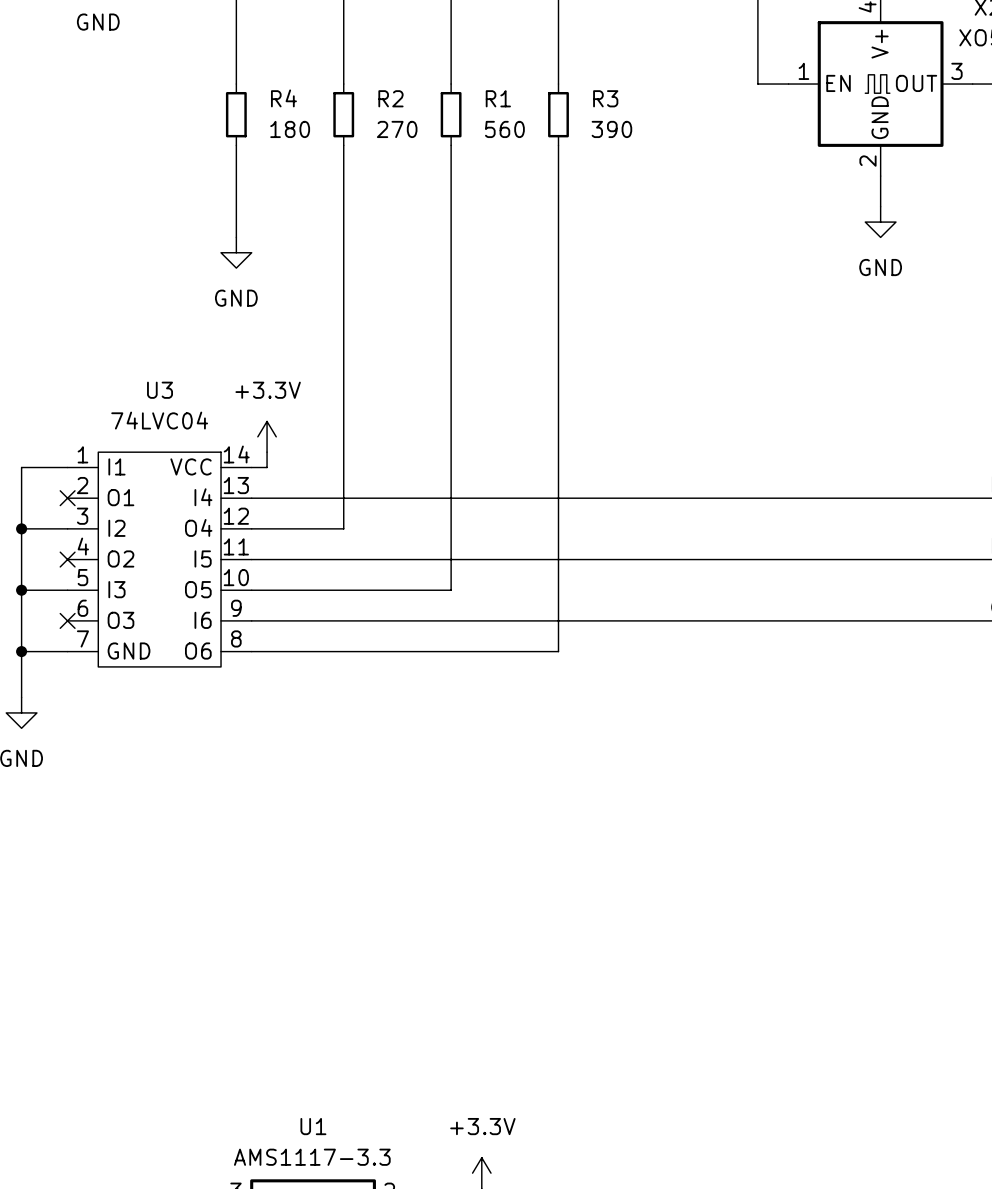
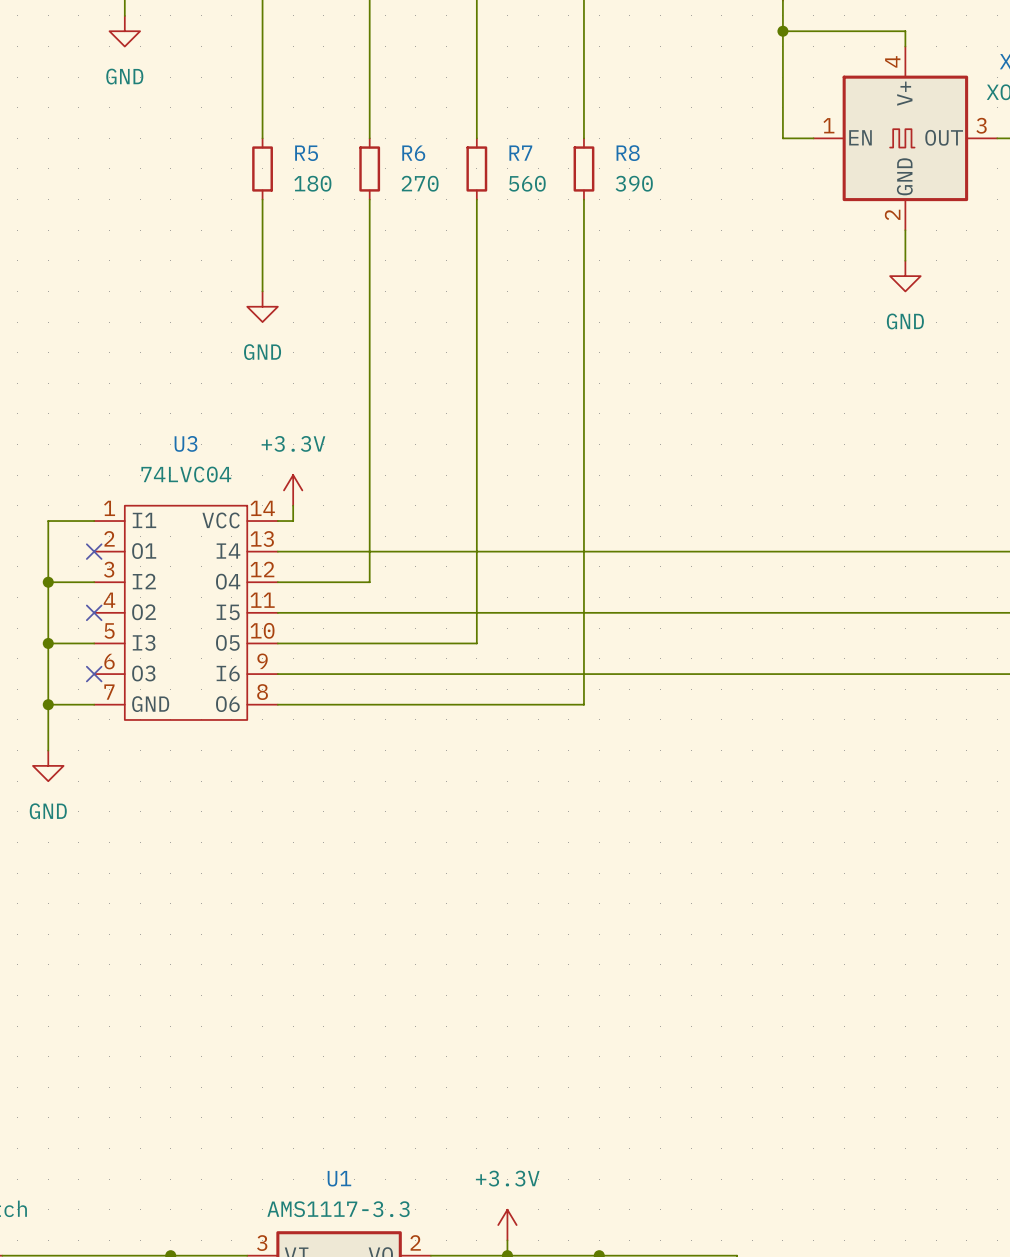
R4 name: R4 (283, 98) -> R5 (306, 153)
R2 name: R2 (390, 98) -> R6 (413, 153)
R1 name: R1 (498, 98) -> R7 (520, 153)
R3 name: R3 (605, 98) -> R8 (628, 153)

